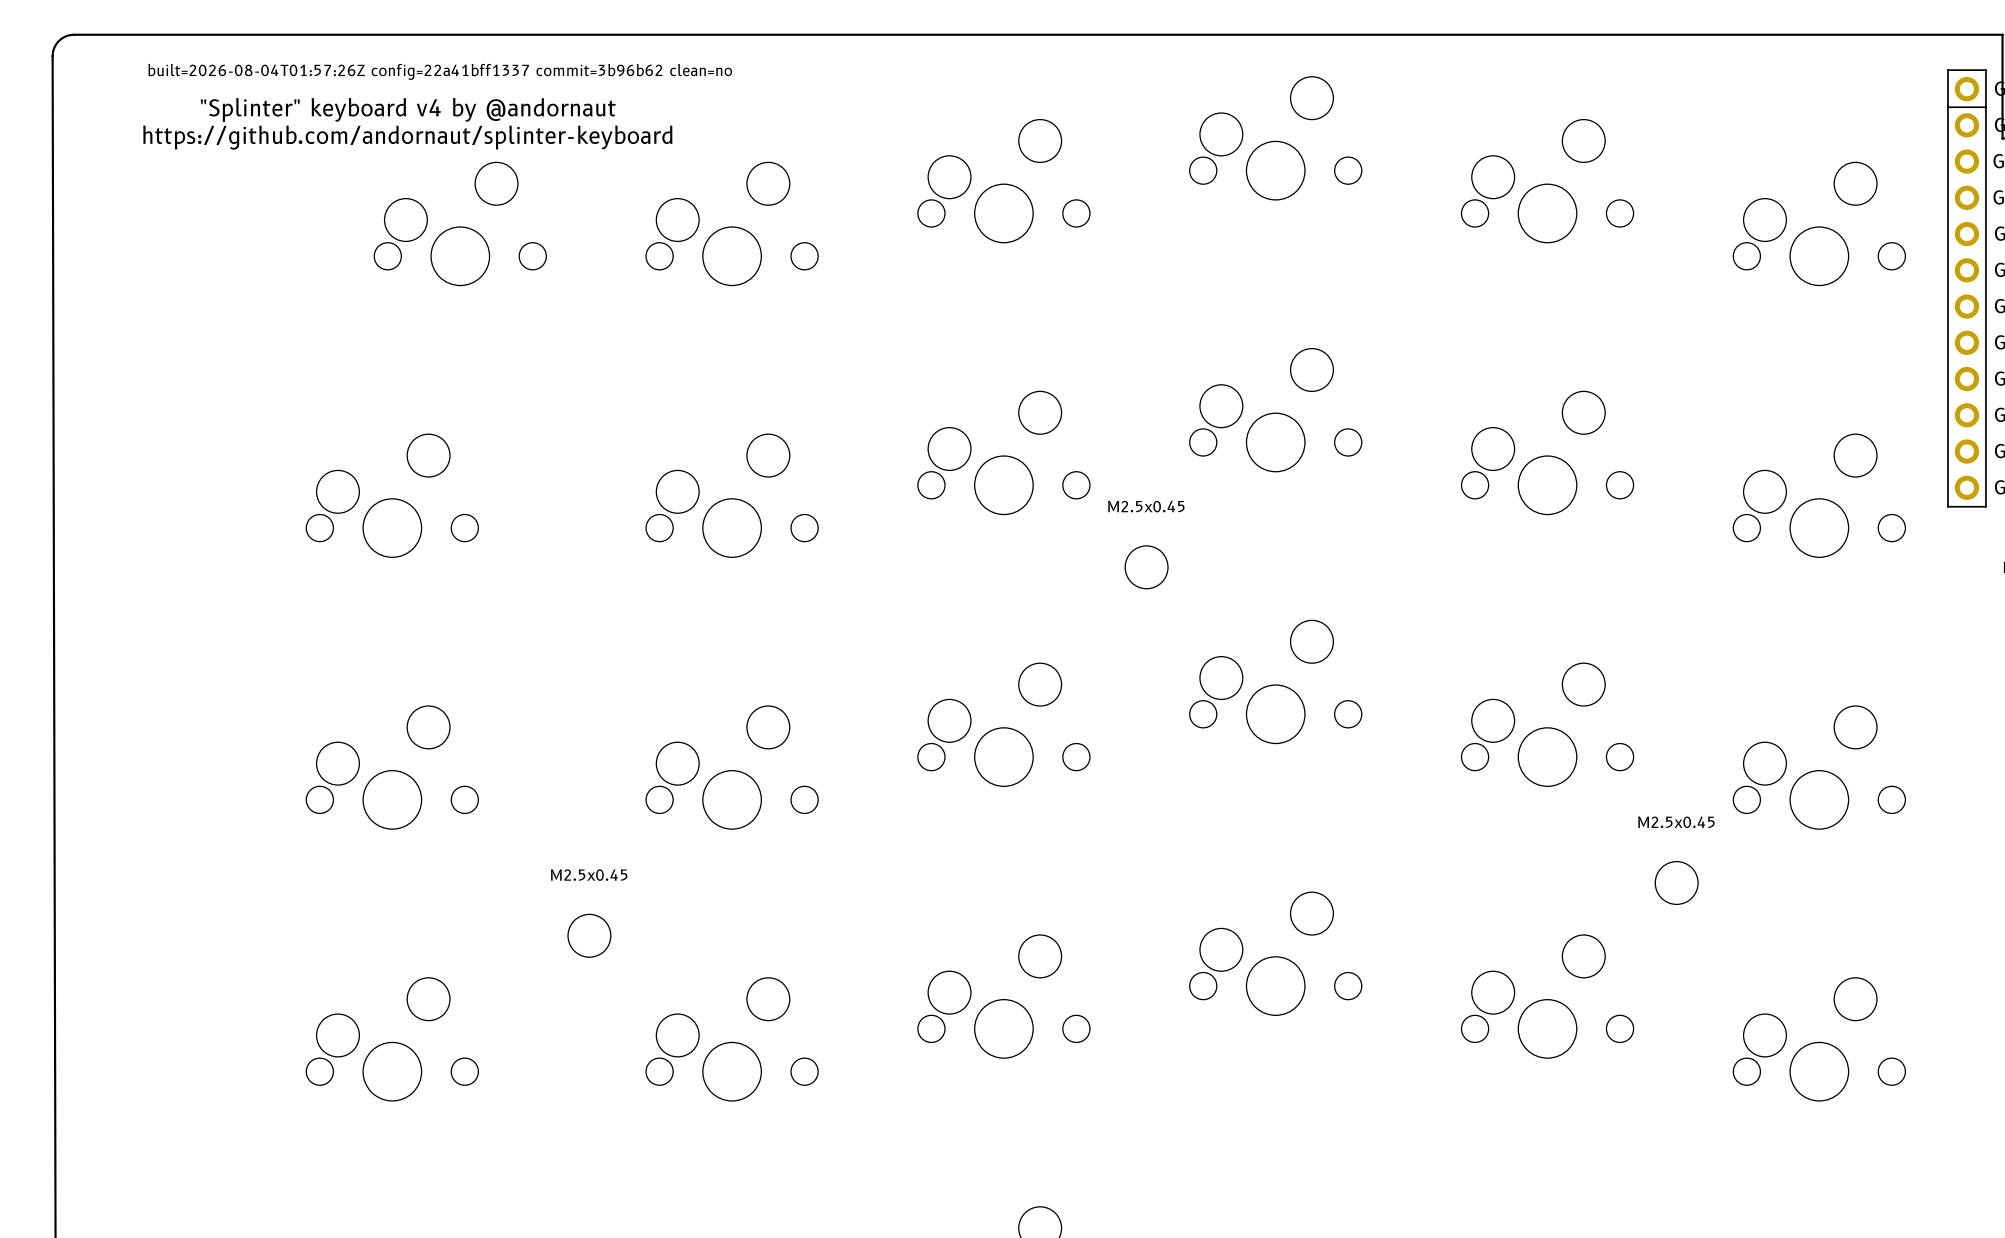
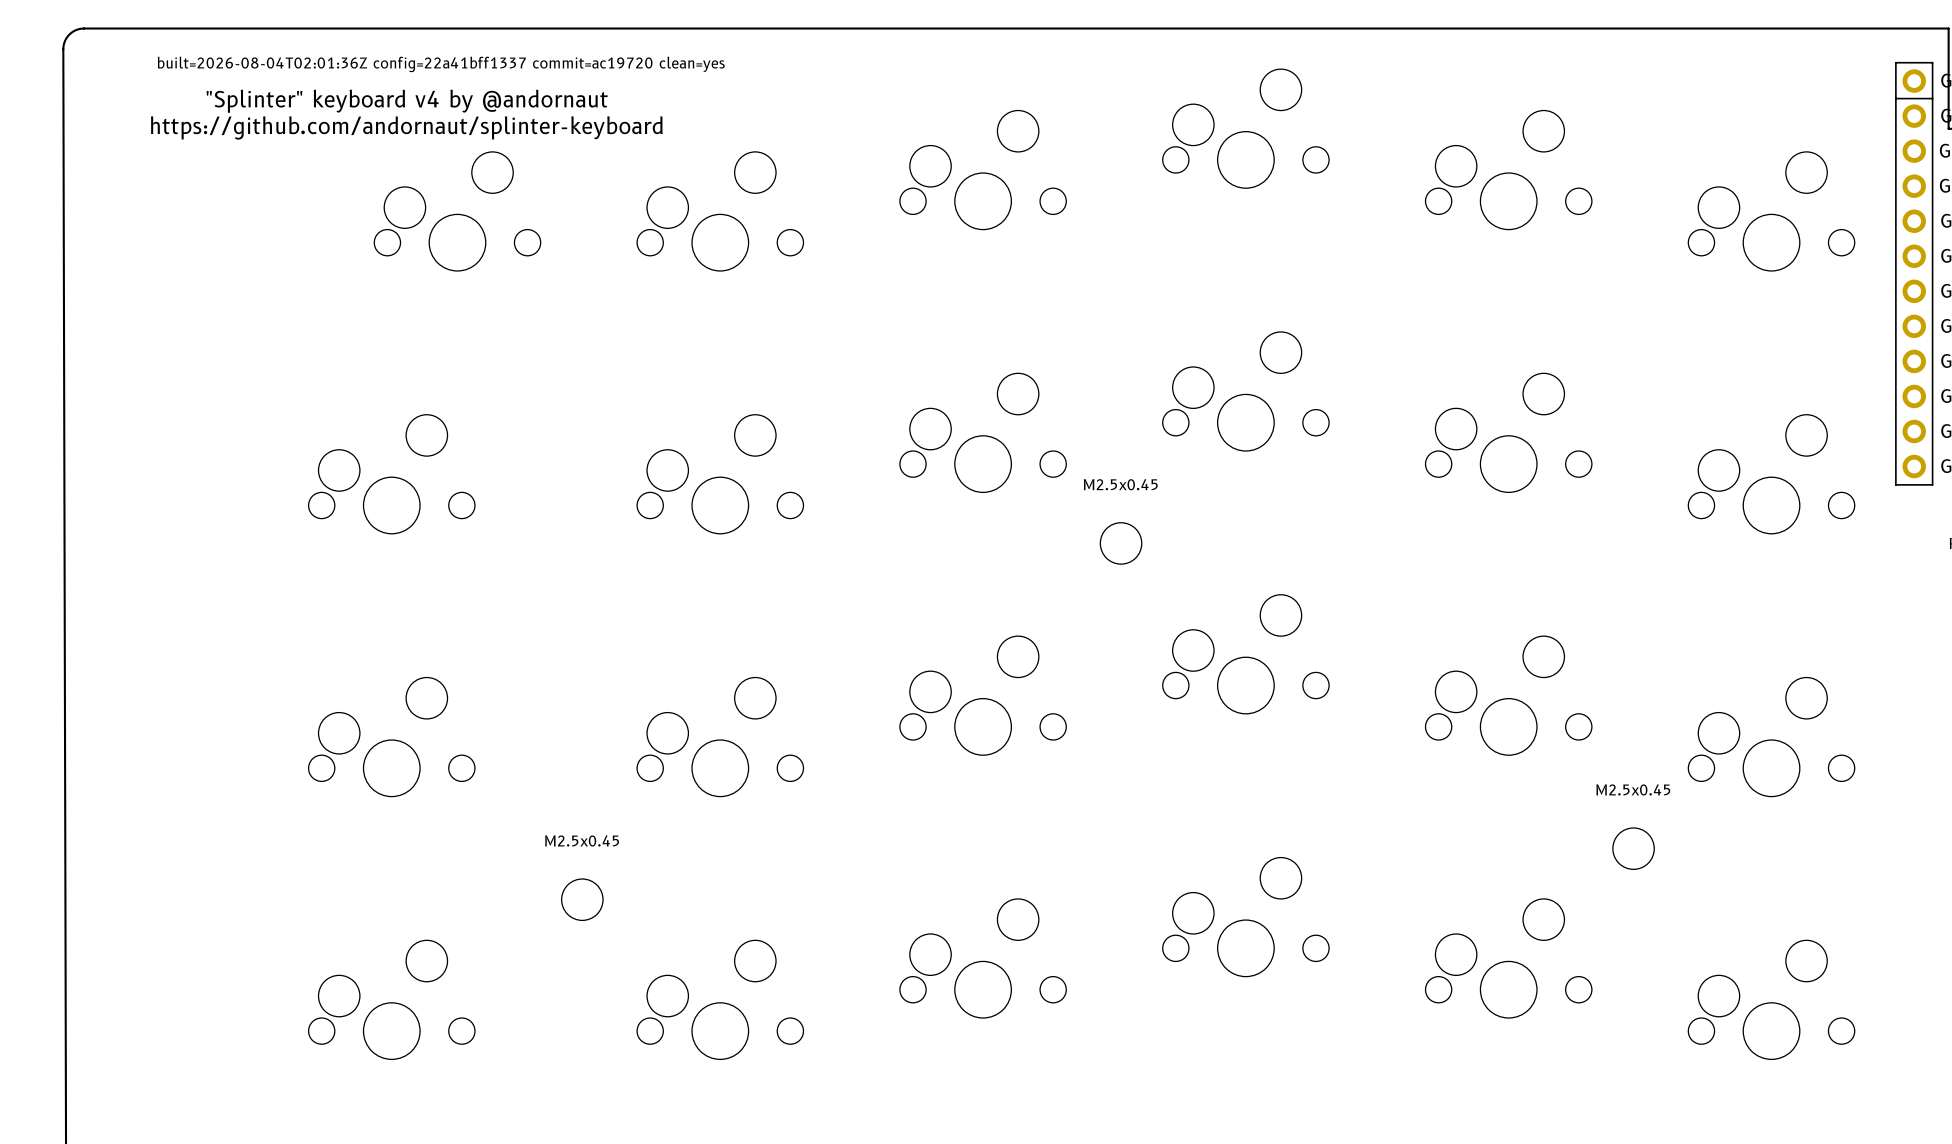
text: built=2026-08-04T01:57:26Z config=22a41bff1337 commit=3b96b62 clean=no (440, 71) -> built=2026-08-04T02:01:36Z config=22a41bff1337 commit=ac19720 clean=yes (441, 64)

